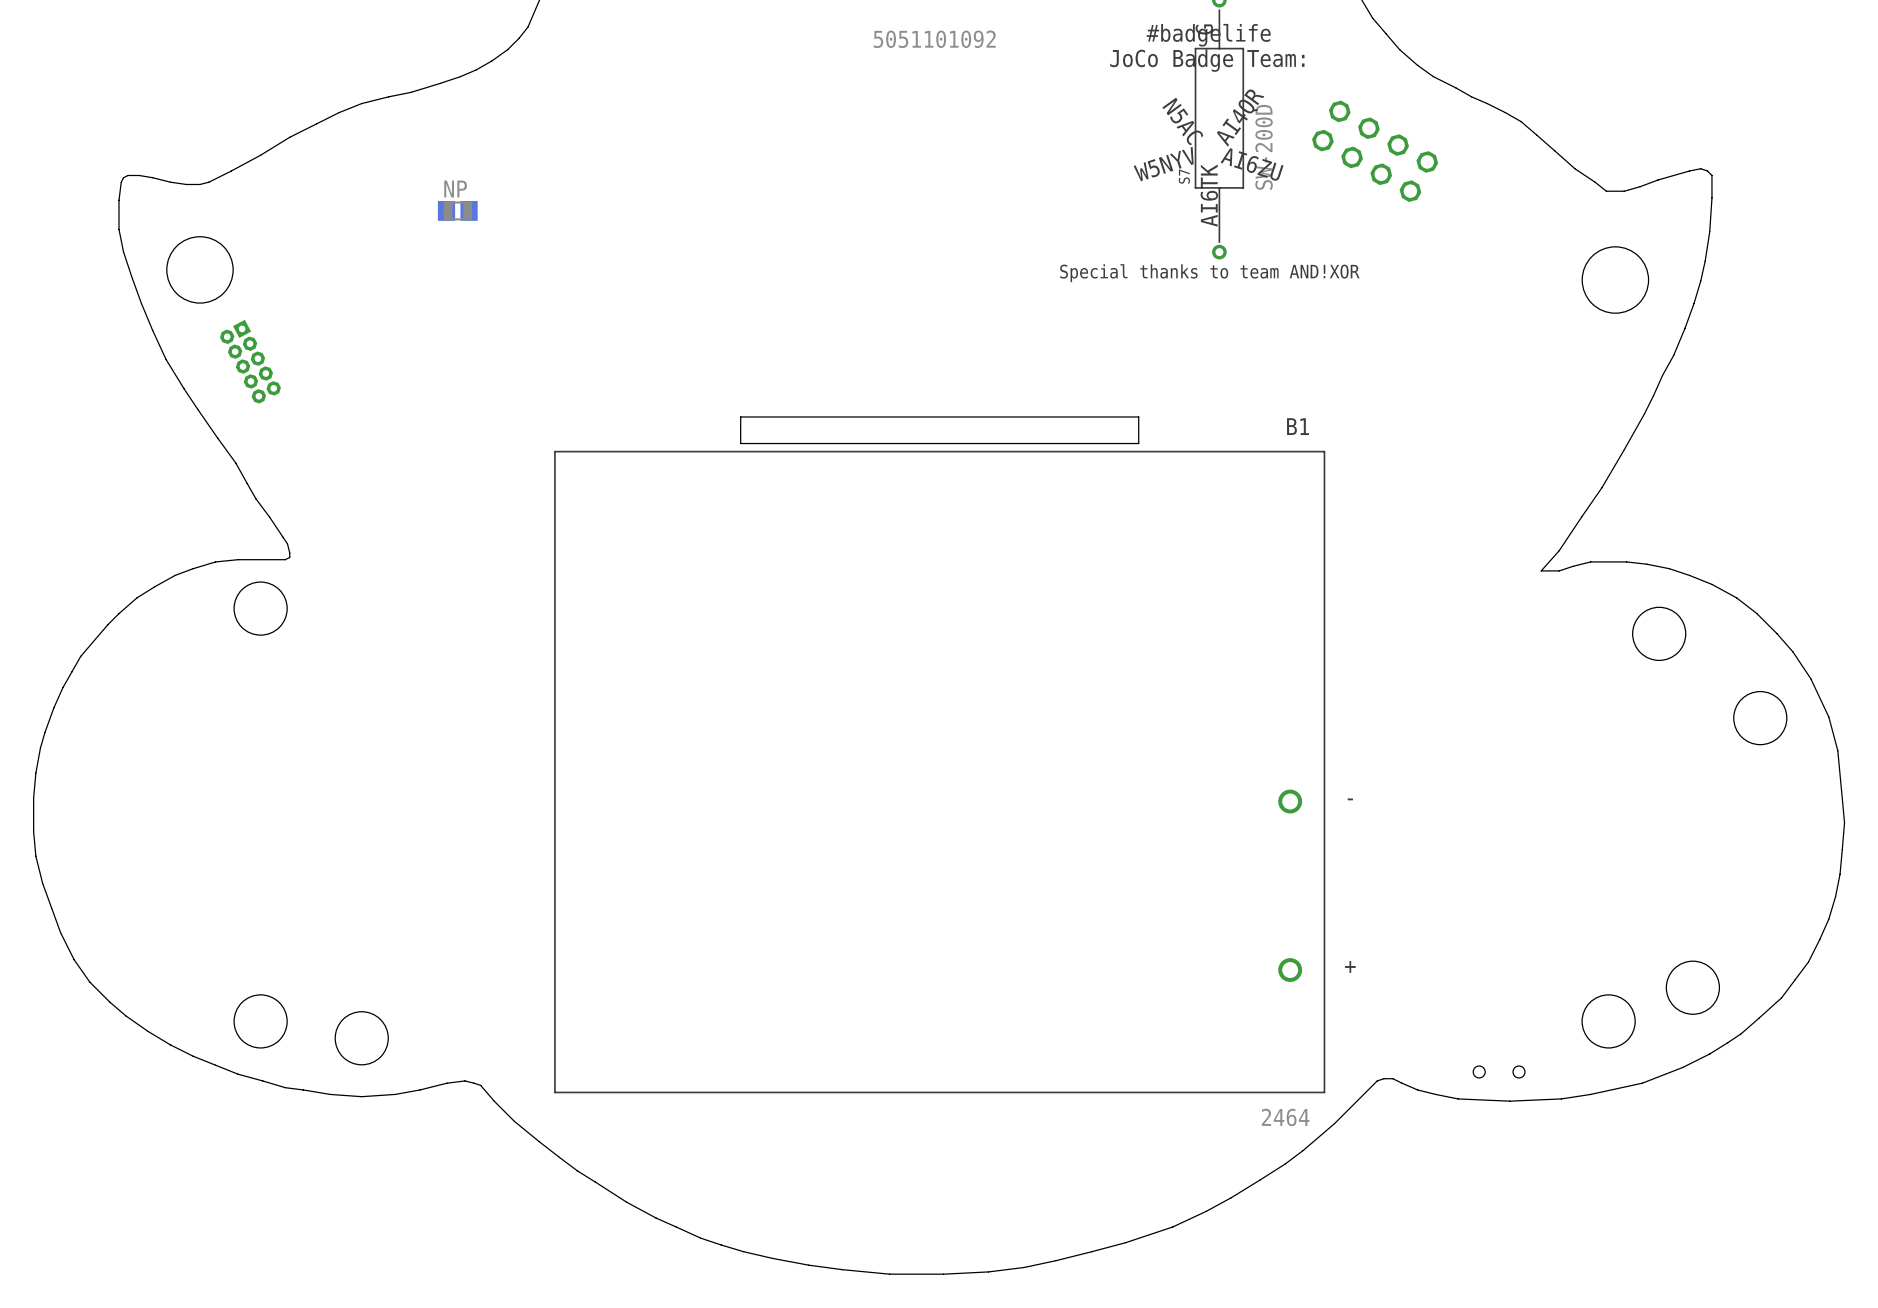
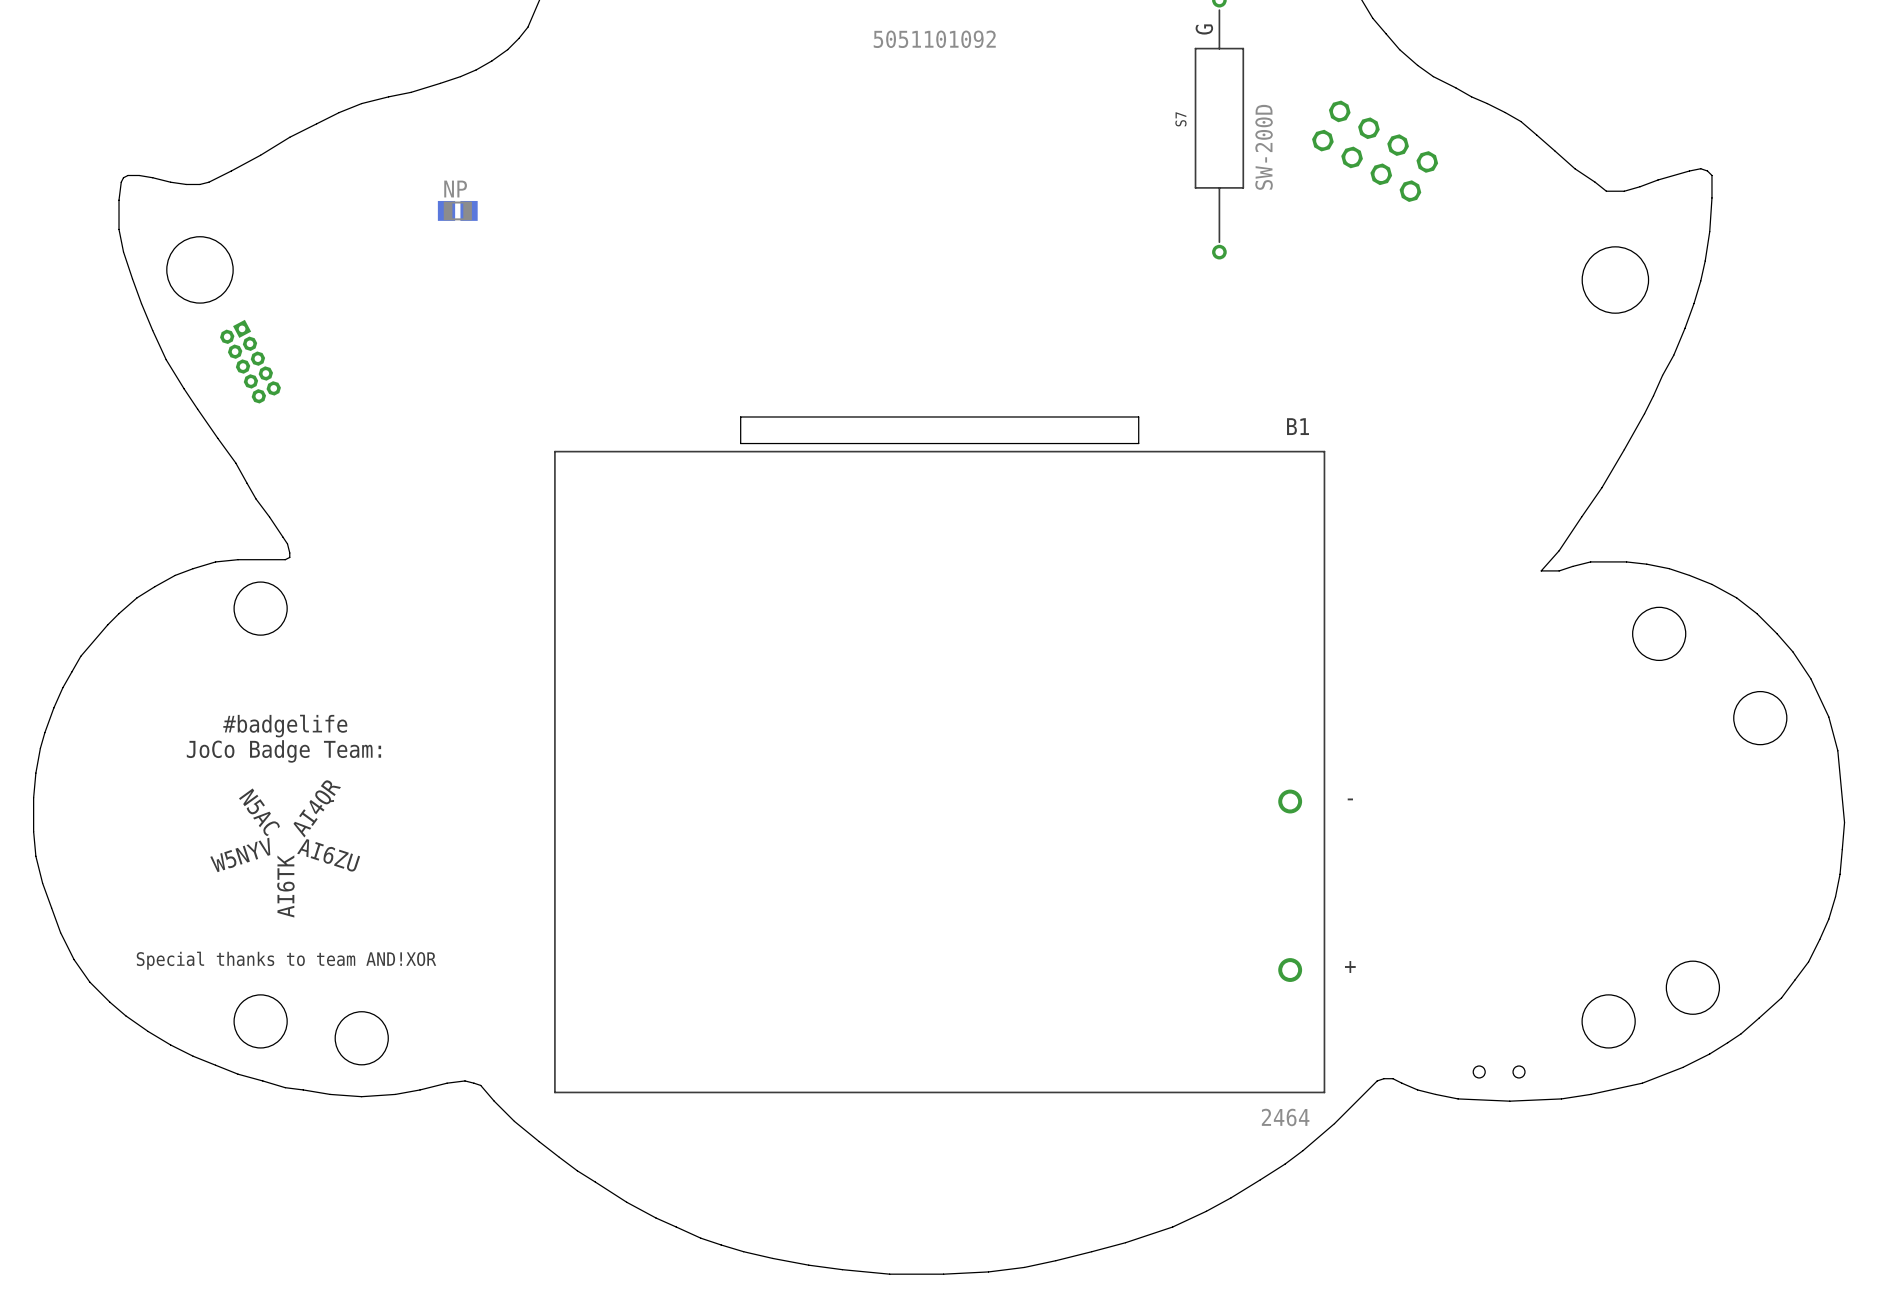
text: #badgelife (1208, 35) -> none
text: JoCo Badge Team: (1207, 60) -> none
text: AI4QR (1240, 117) -> none
text: N5AC (1182, 121) -> none
text: W5NYV (1163, 164) -> none
text: AI6ZU (1252, 164) -> none
S7 name position: S7 (1184, 176) -> S7 (1180, 119)
text: AI6TK (1209, 195) -> none
text: Special thanks to team AND!XOR (1209, 273) -> none
text: none -> #badgelife (285, 726)
text: none -> JoCo Badge Team: (283, 751)
text: none -> AI4QR (317, 808)
text: none -> N5AC (259, 812)
text: none -> W5NYV (240, 854)
text: none -> AI6ZU (328, 855)
text: none -> AI6TK (285, 886)
text: none -> Special thanks to team AND!XOR (286, 960)

